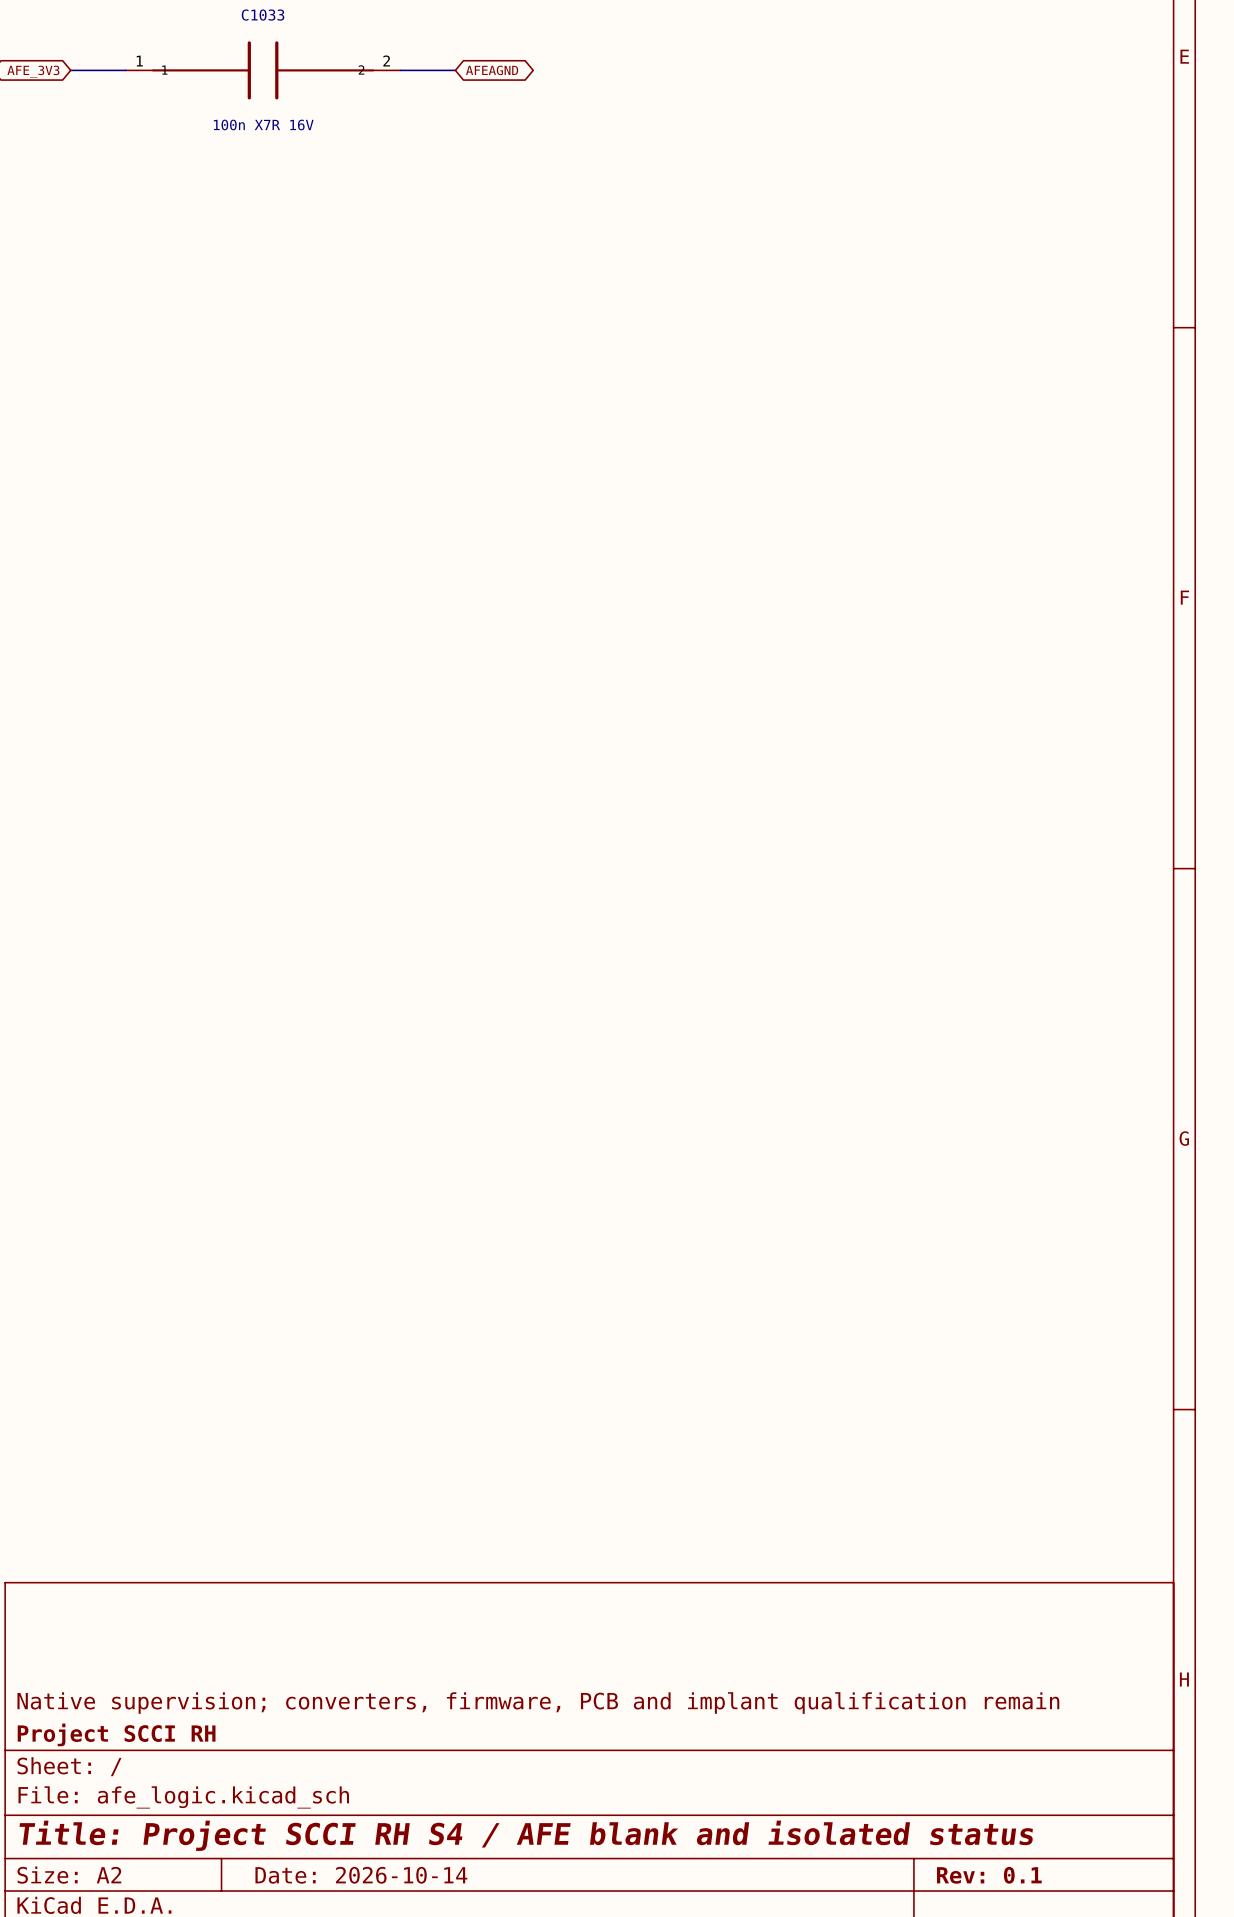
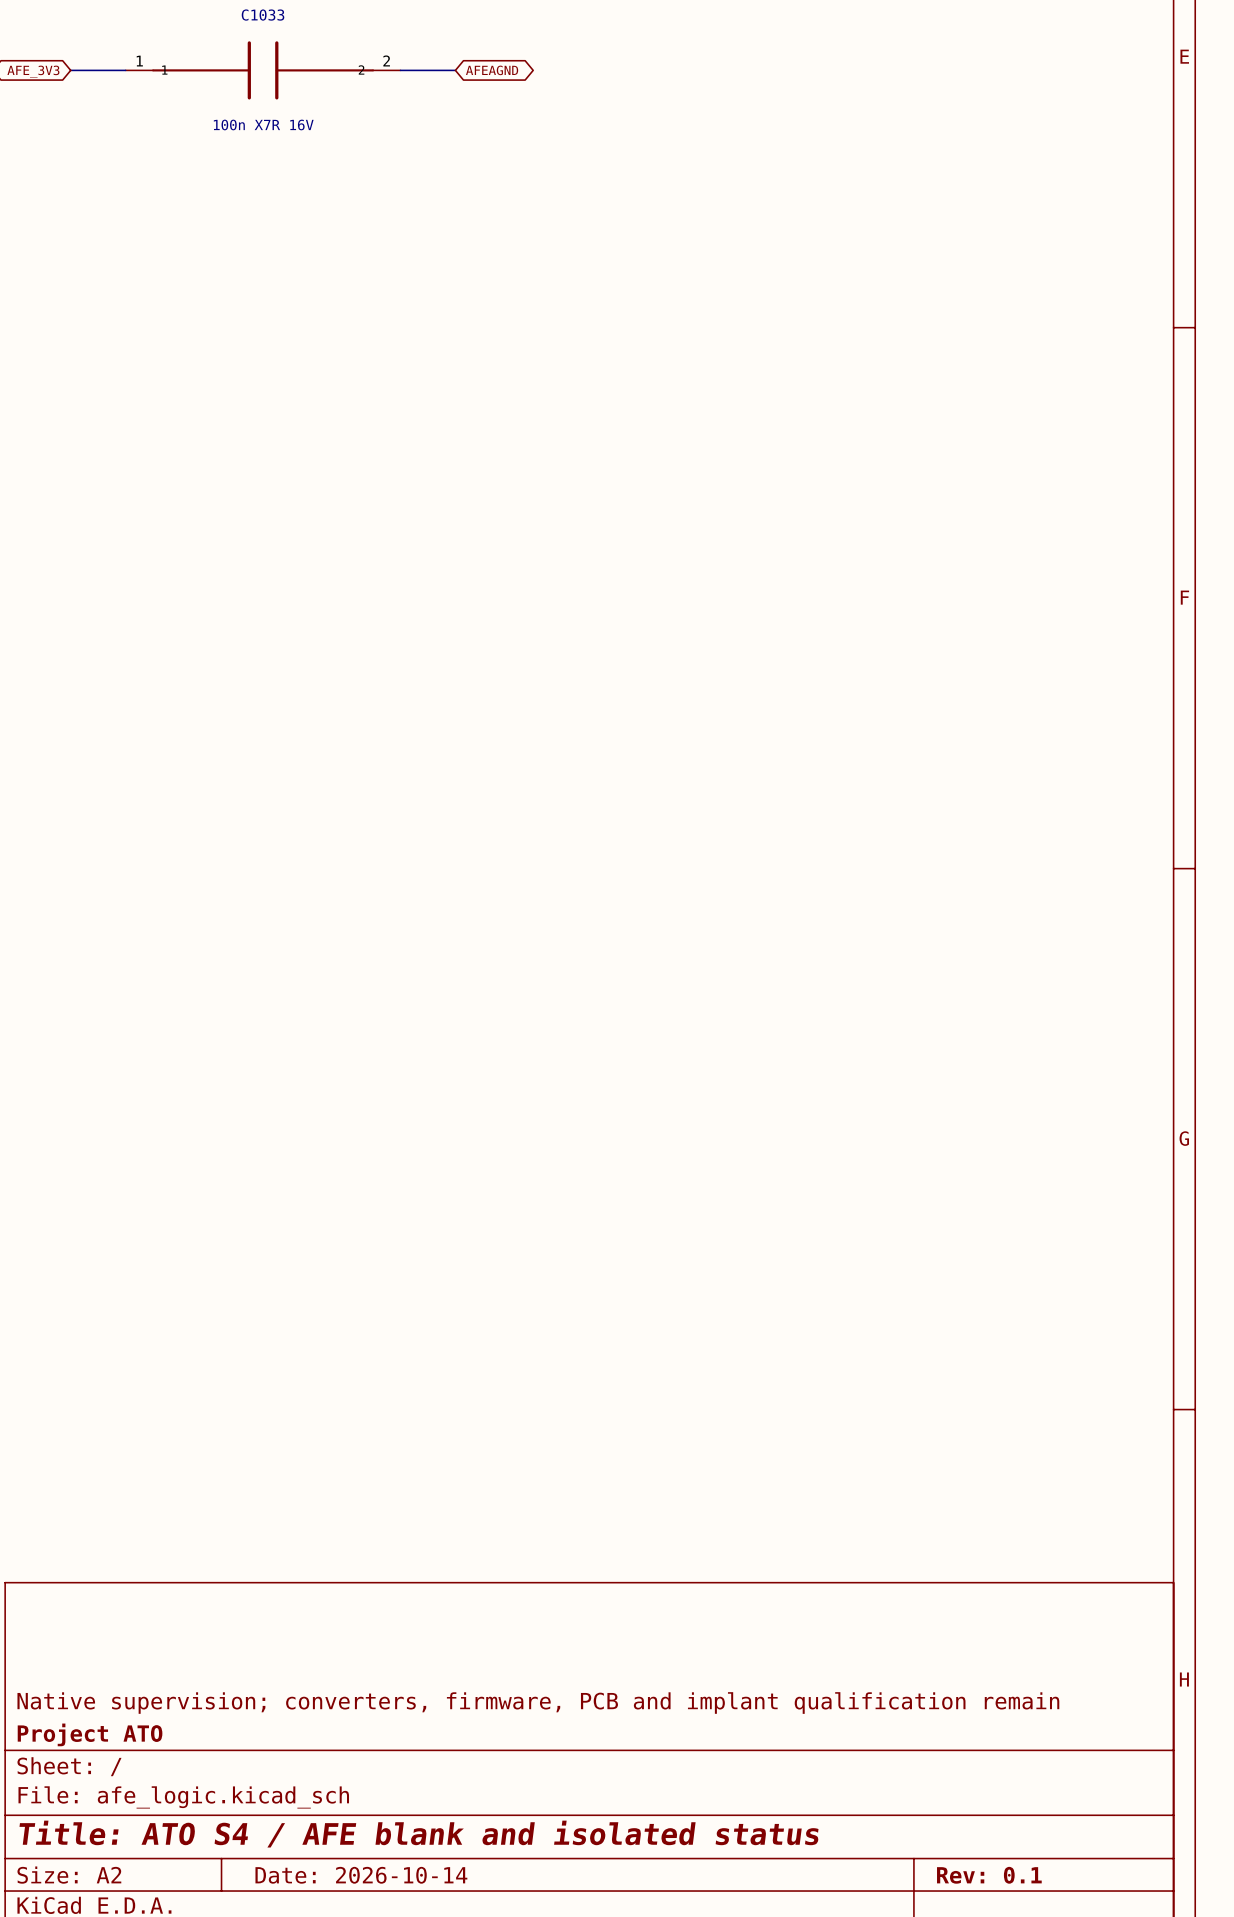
title block: Project SCCI RH (116, 1734) -> Project ATO (90, 1734)
title block: Title: Project SCCI RH S4 / AFE blank and isolated status (526, 1835) -> Title: ATO S4 / AFE blank and isolated status (419, 1834)

